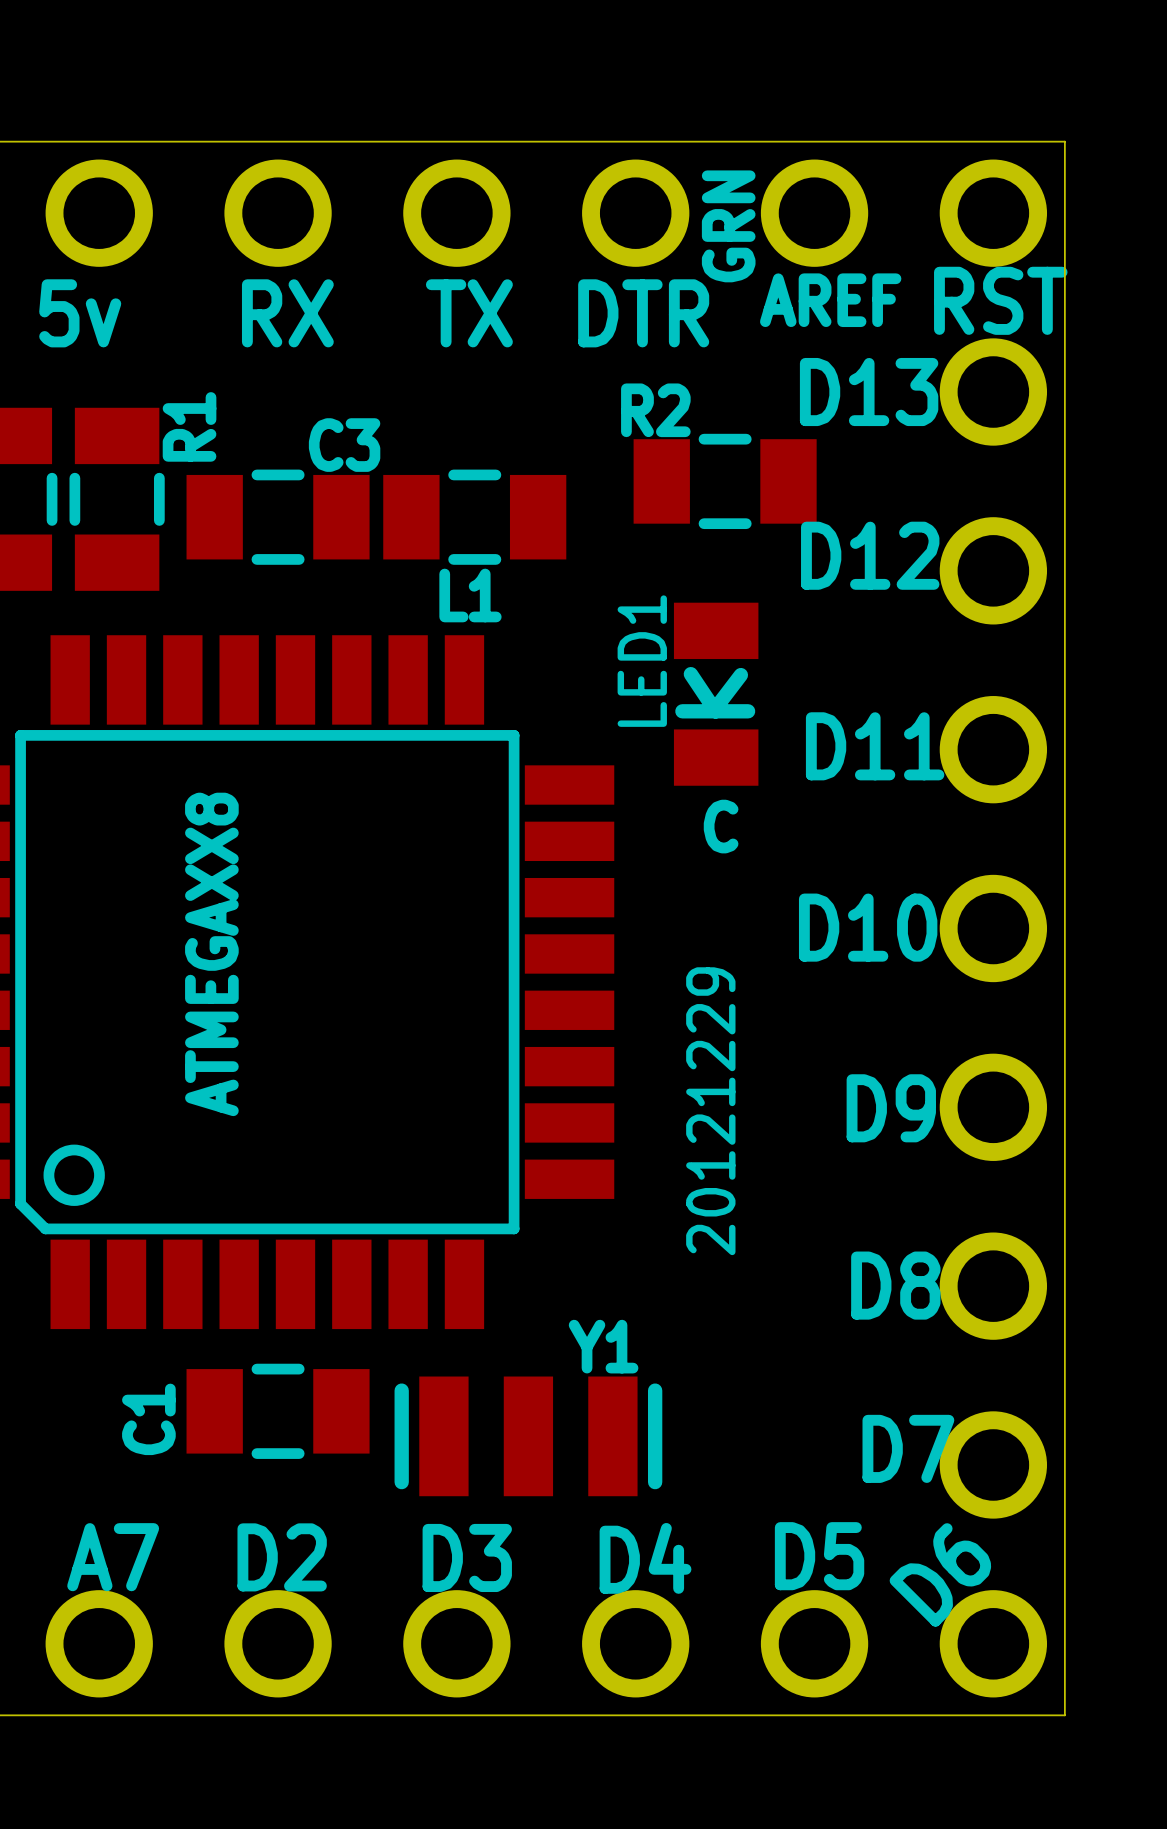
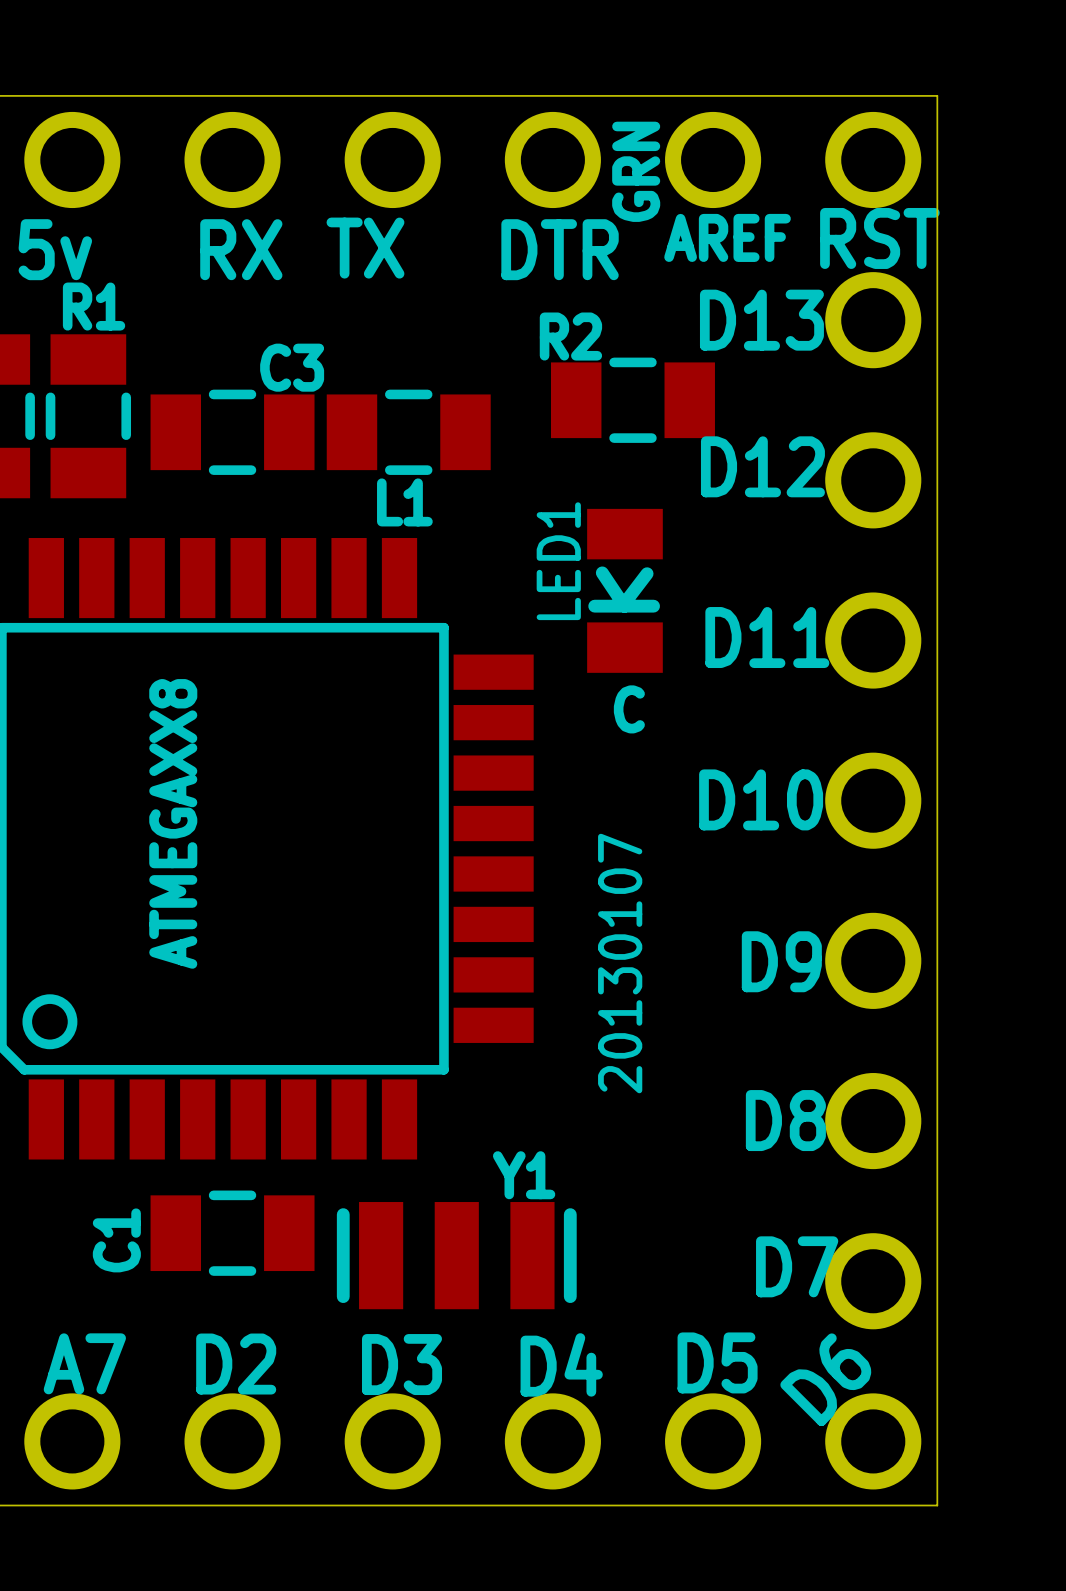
text position: TX (469, 313) -> TX (365, 248)
R1 name rotation: 0° (189, 426) -> 90° clockwise (94, 306)
text: 20121229 (710, 1111) -> 20130107 (620, 963)

